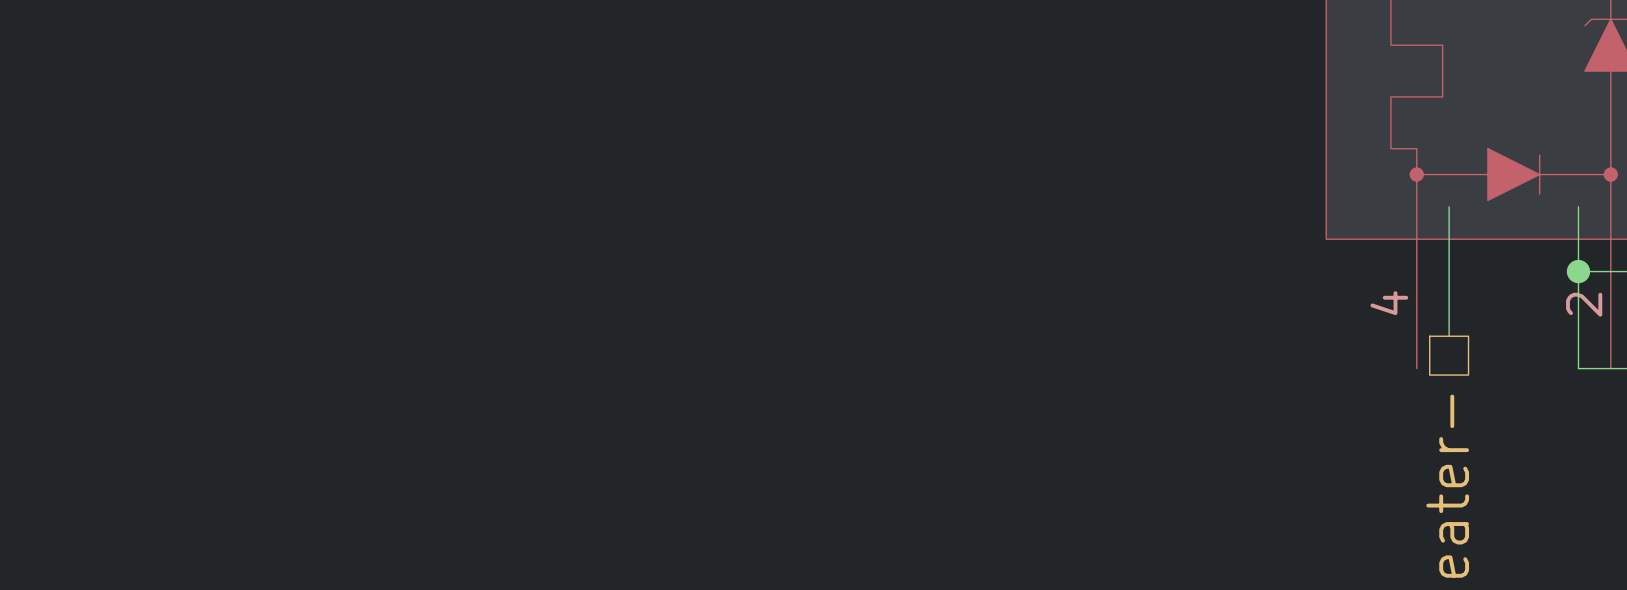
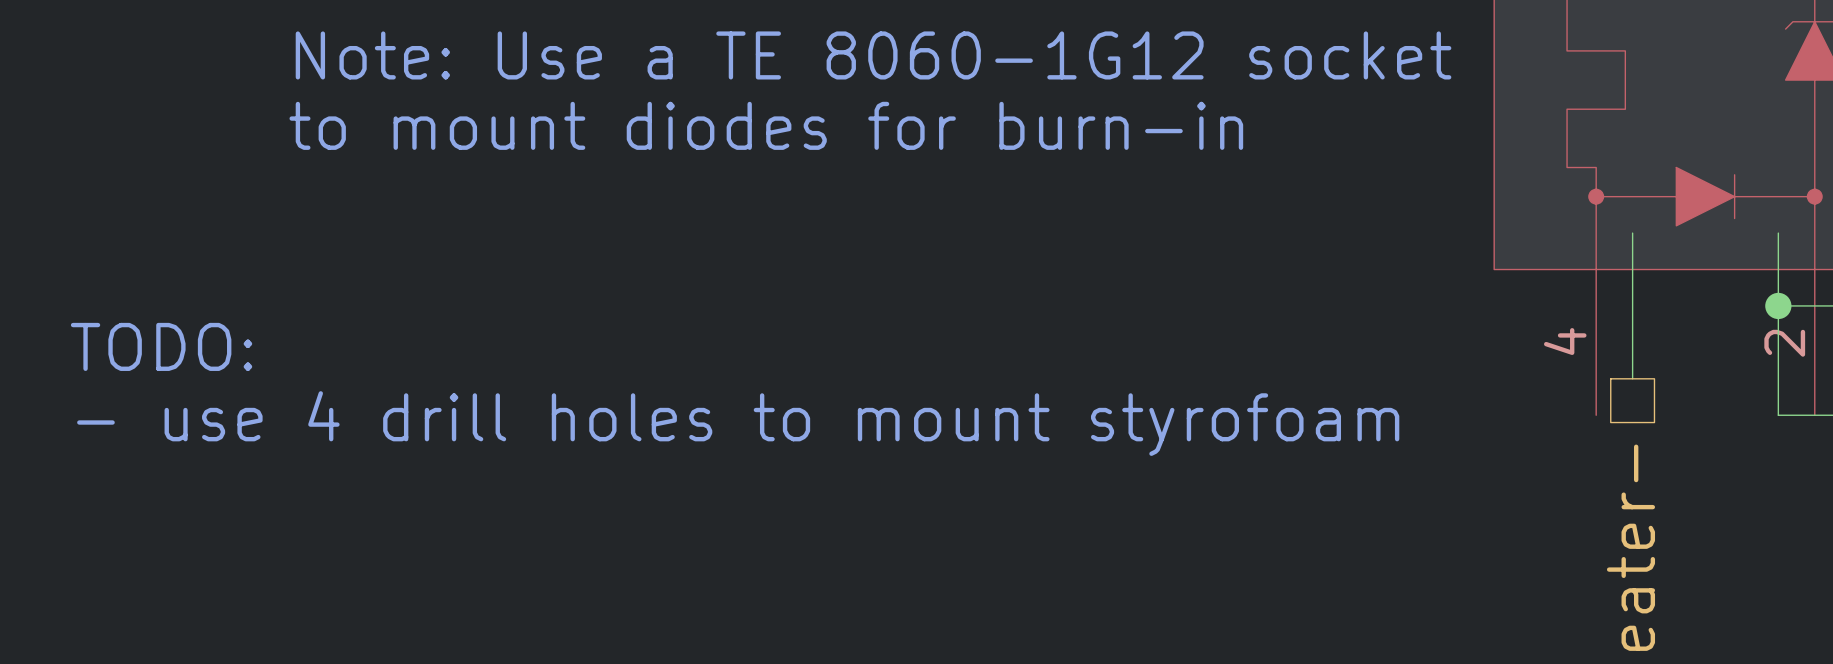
text: none -> Note: Use a TE 8060-1G12 socket (873, 55)
text: none -> to mount diodes for burn-in (766, 125)
text: none -> TODO: (161, 346)
text: none -> - use 4 drill holes to mount styrofoam (738, 423)

